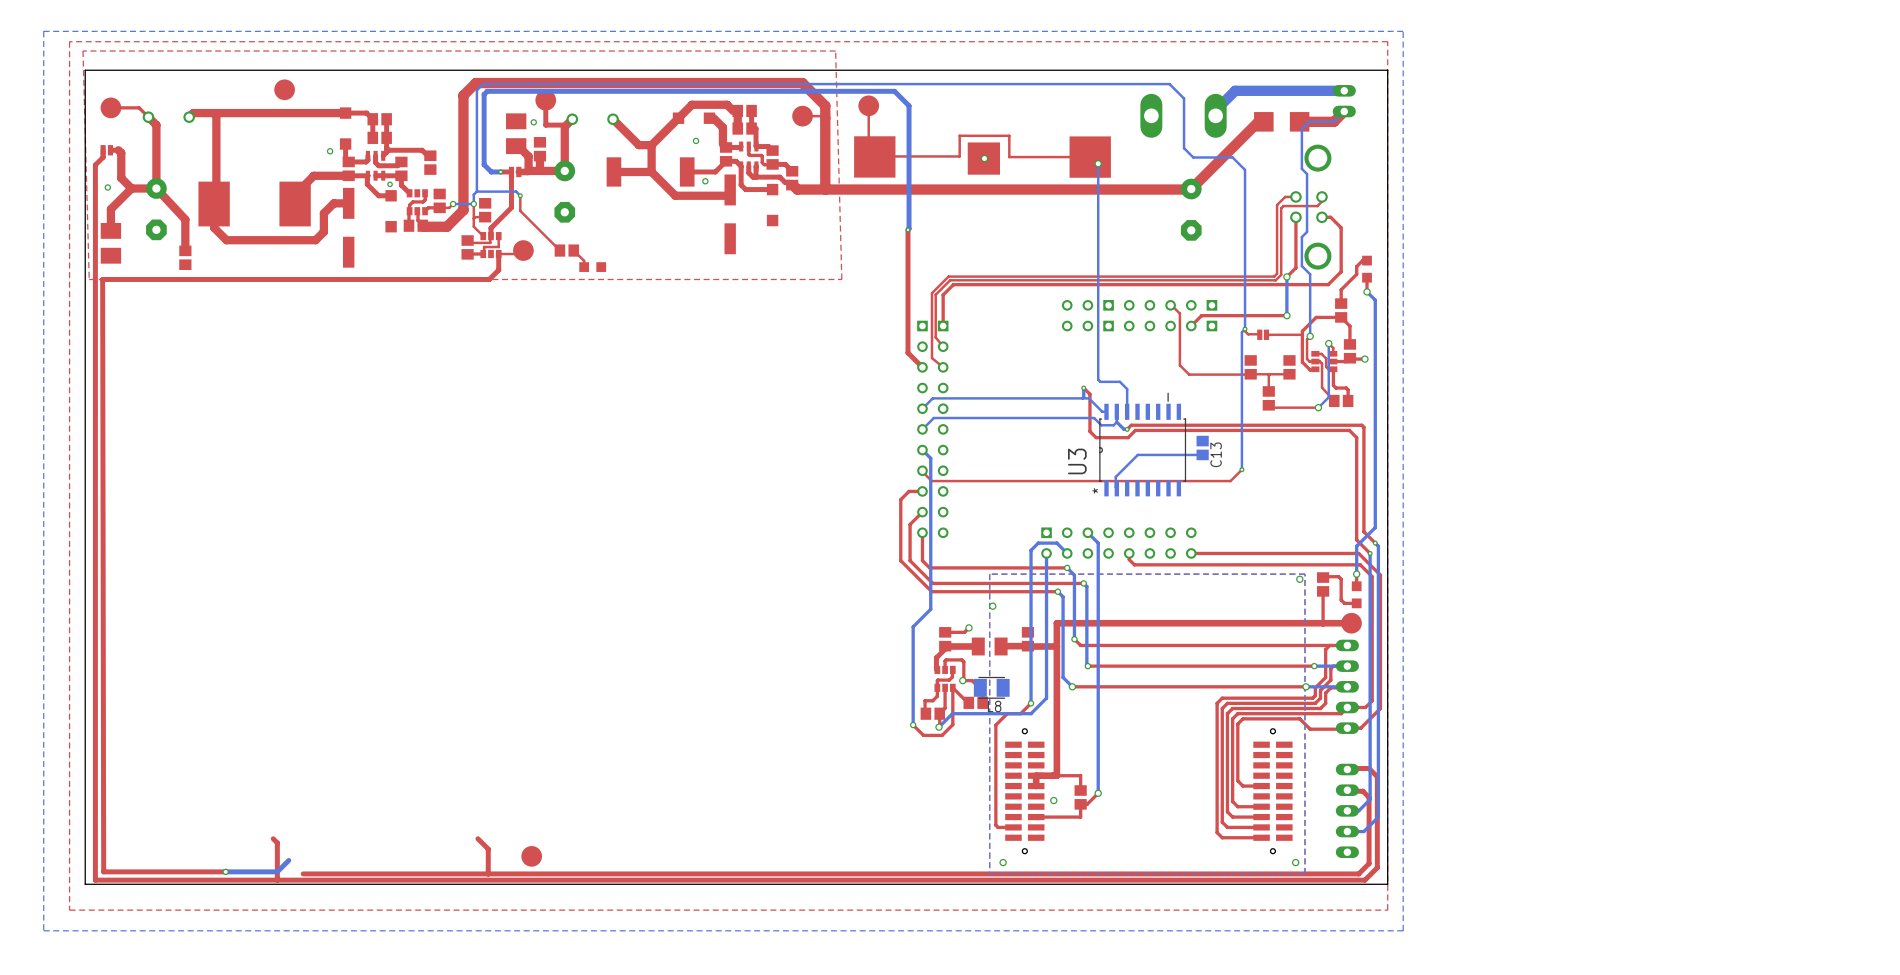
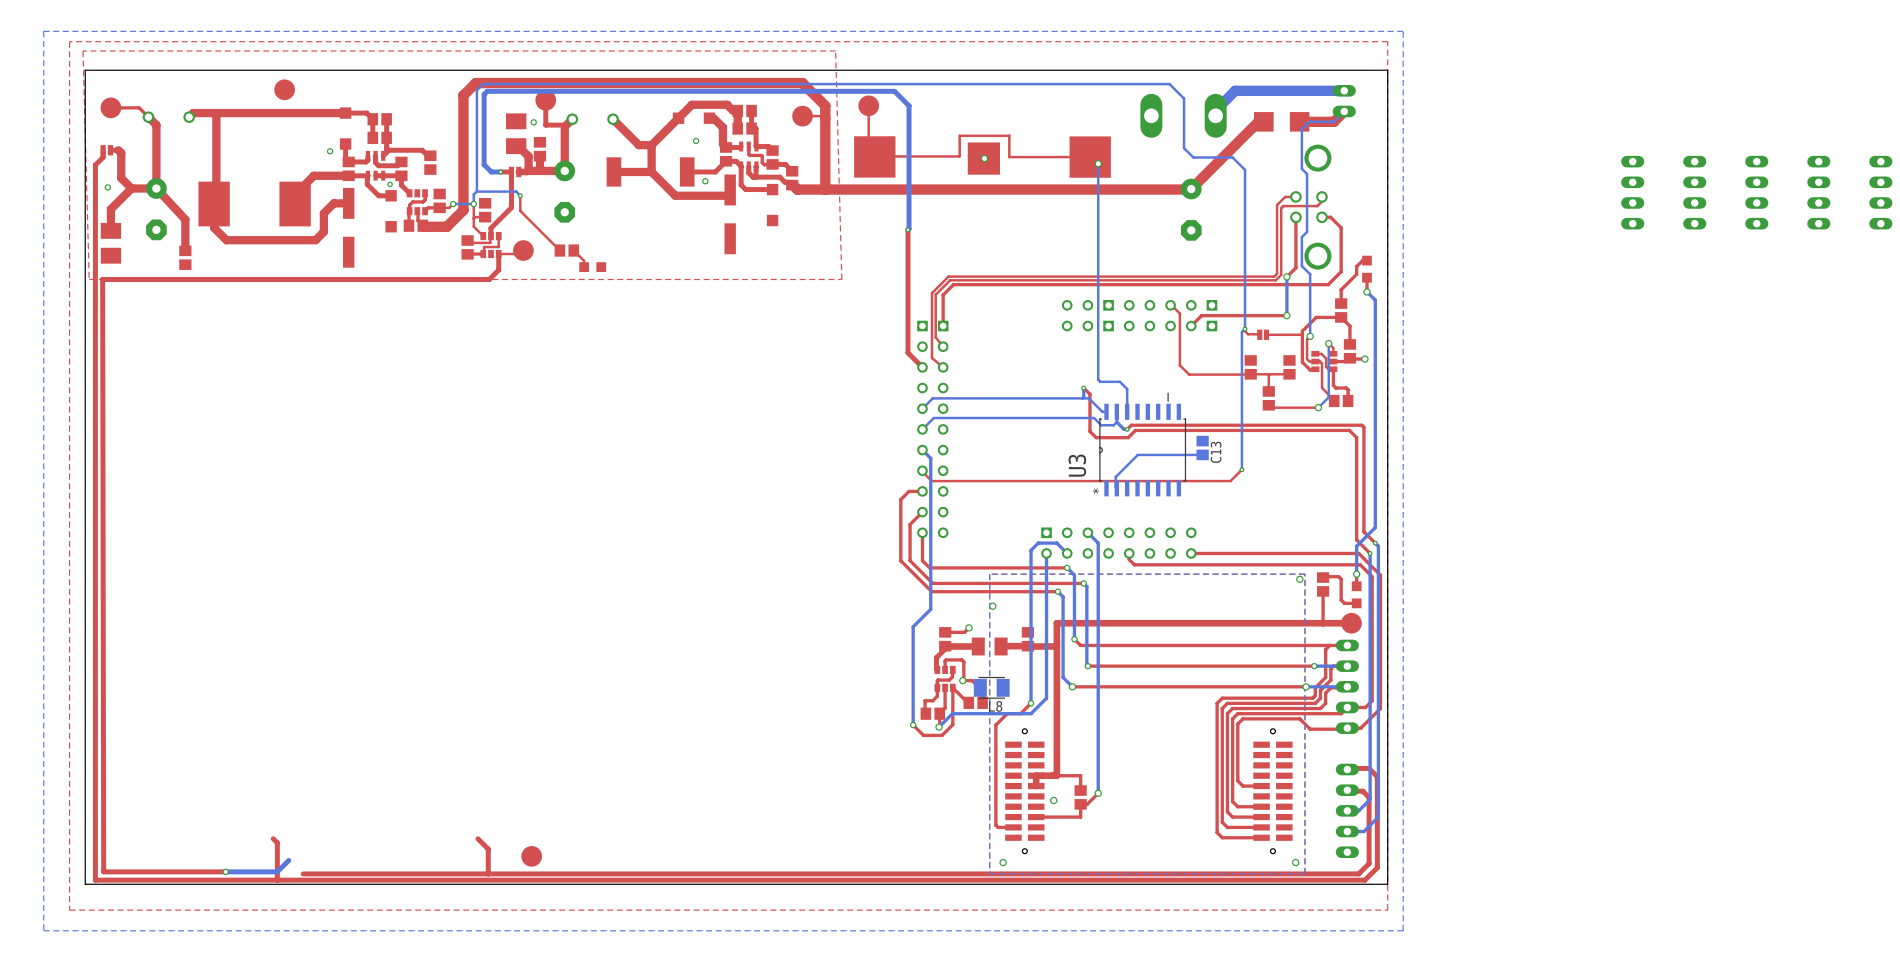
part: none -> (1632, 192)
part: none -> (1694, 192)
part: none -> (1756, 192)
part: none -> (1818, 192)
part: none -> (1880, 192)

